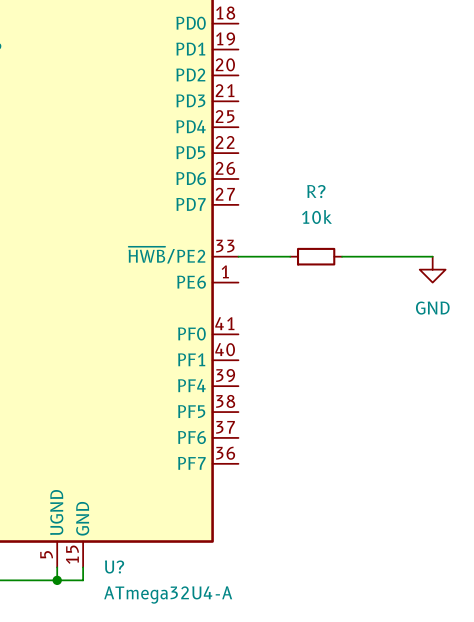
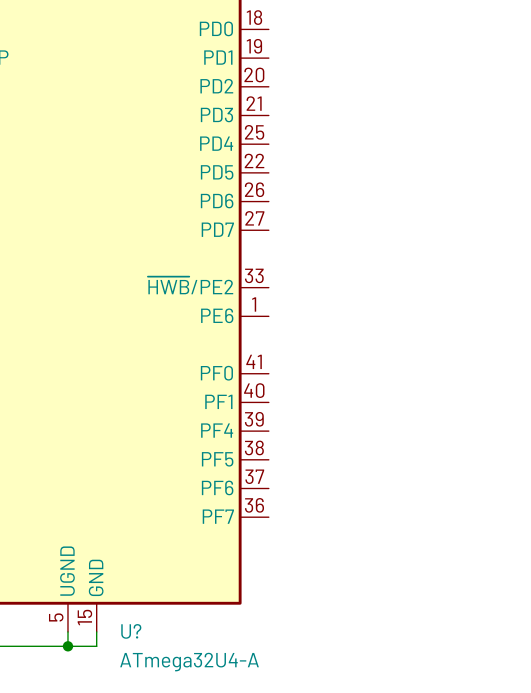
wire: (238, 256) (290, 256) -> none
R?: 10k (316, 256) -> none
wire: (342, 256) (432, 256) -> none
power symbol: GND (432, 269) -> none

